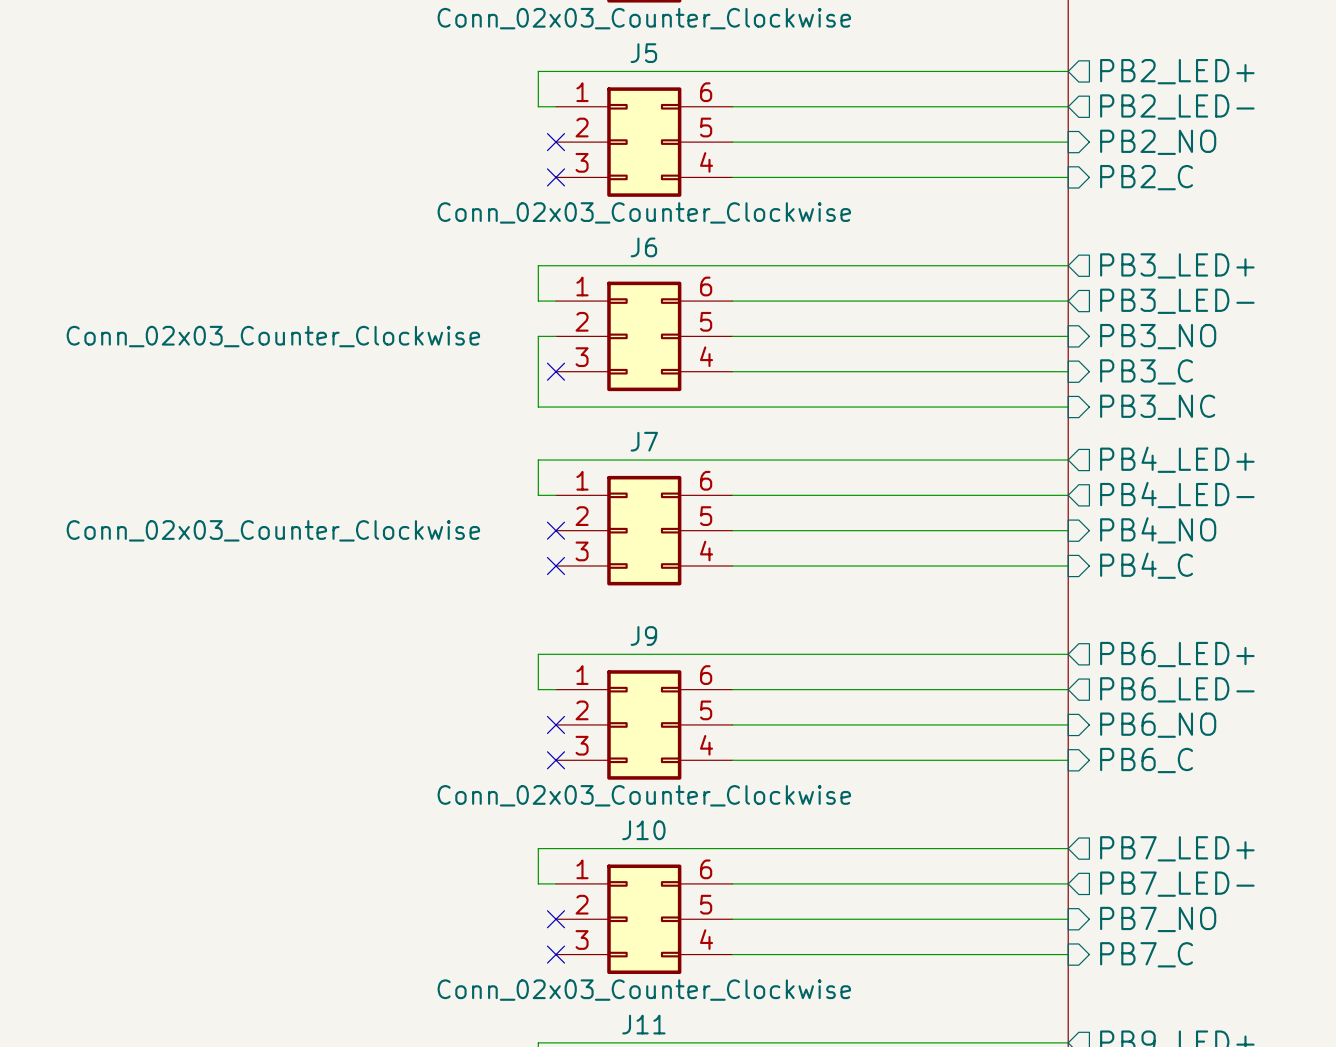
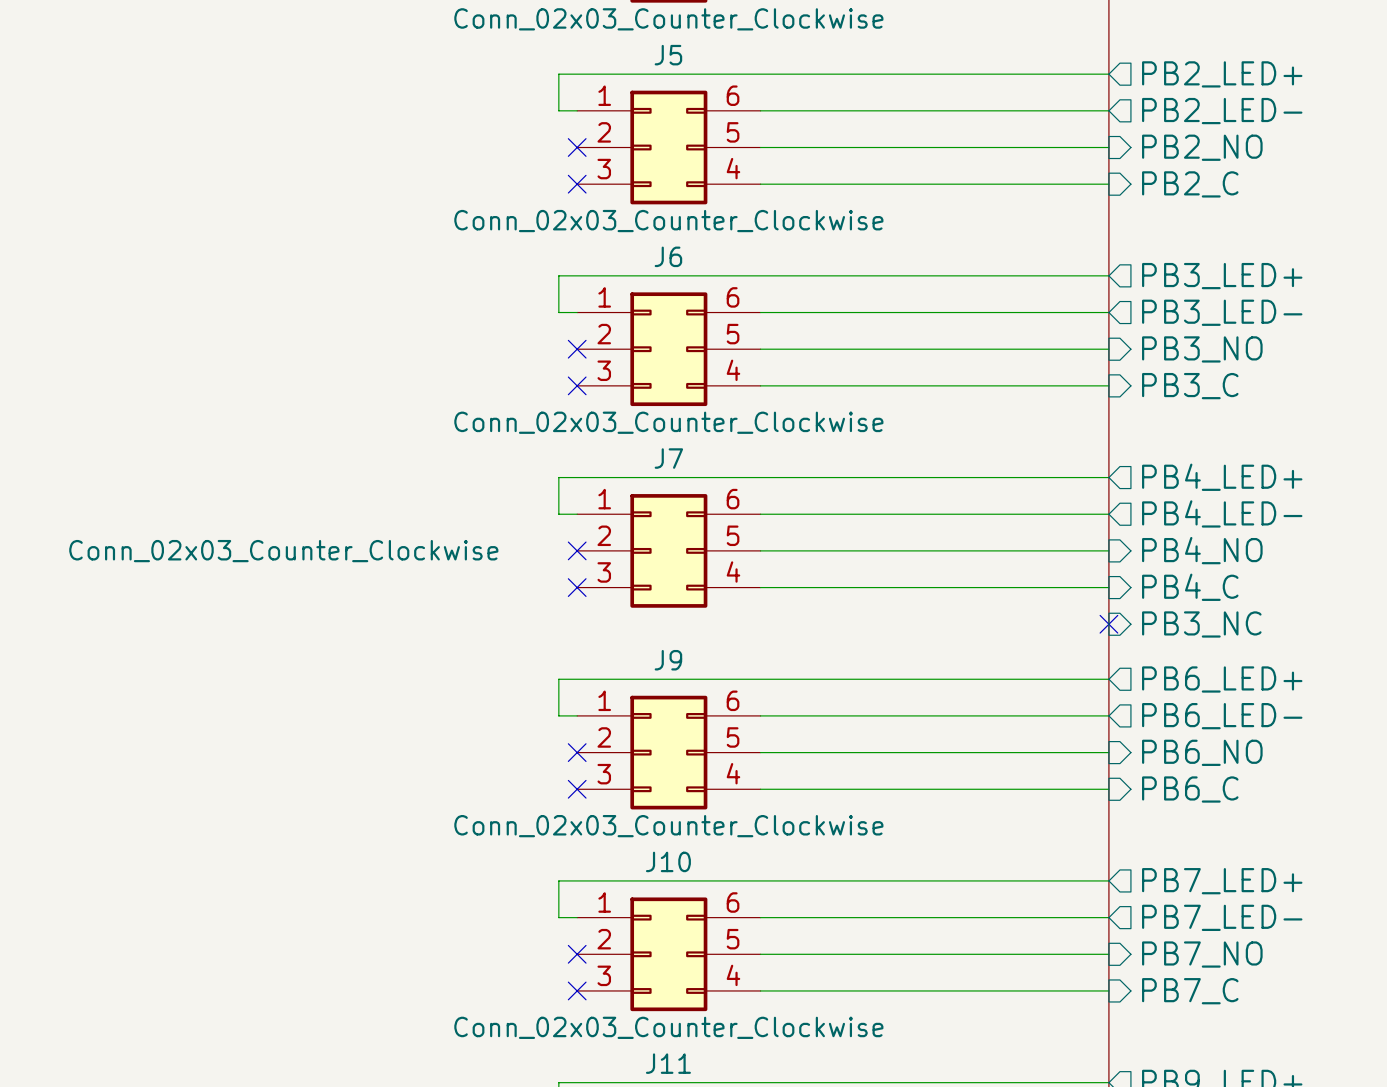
J6 value position: Conn_02x03_Counter_Clockwise (273, 336) -> Conn_02x03_Counter_Clockwise (668, 422)
wire: (555, 336) (538, 336) (538, 407) (1068, 407) -> none
no-connect mark: none -> (577, 349)
sheet pin position: PB3_NC (1157, 407) -> PB3_NC (1201, 624)
no-connect mark: none -> (1108, 624)

